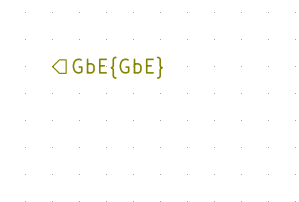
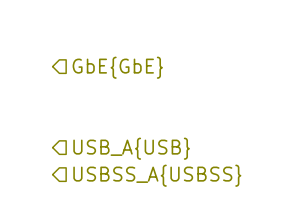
hierarchical label: none -> USB_A{USB} (131, 148)
hierarchical label: none -> USBSS_A{USBSS} (157, 175)

